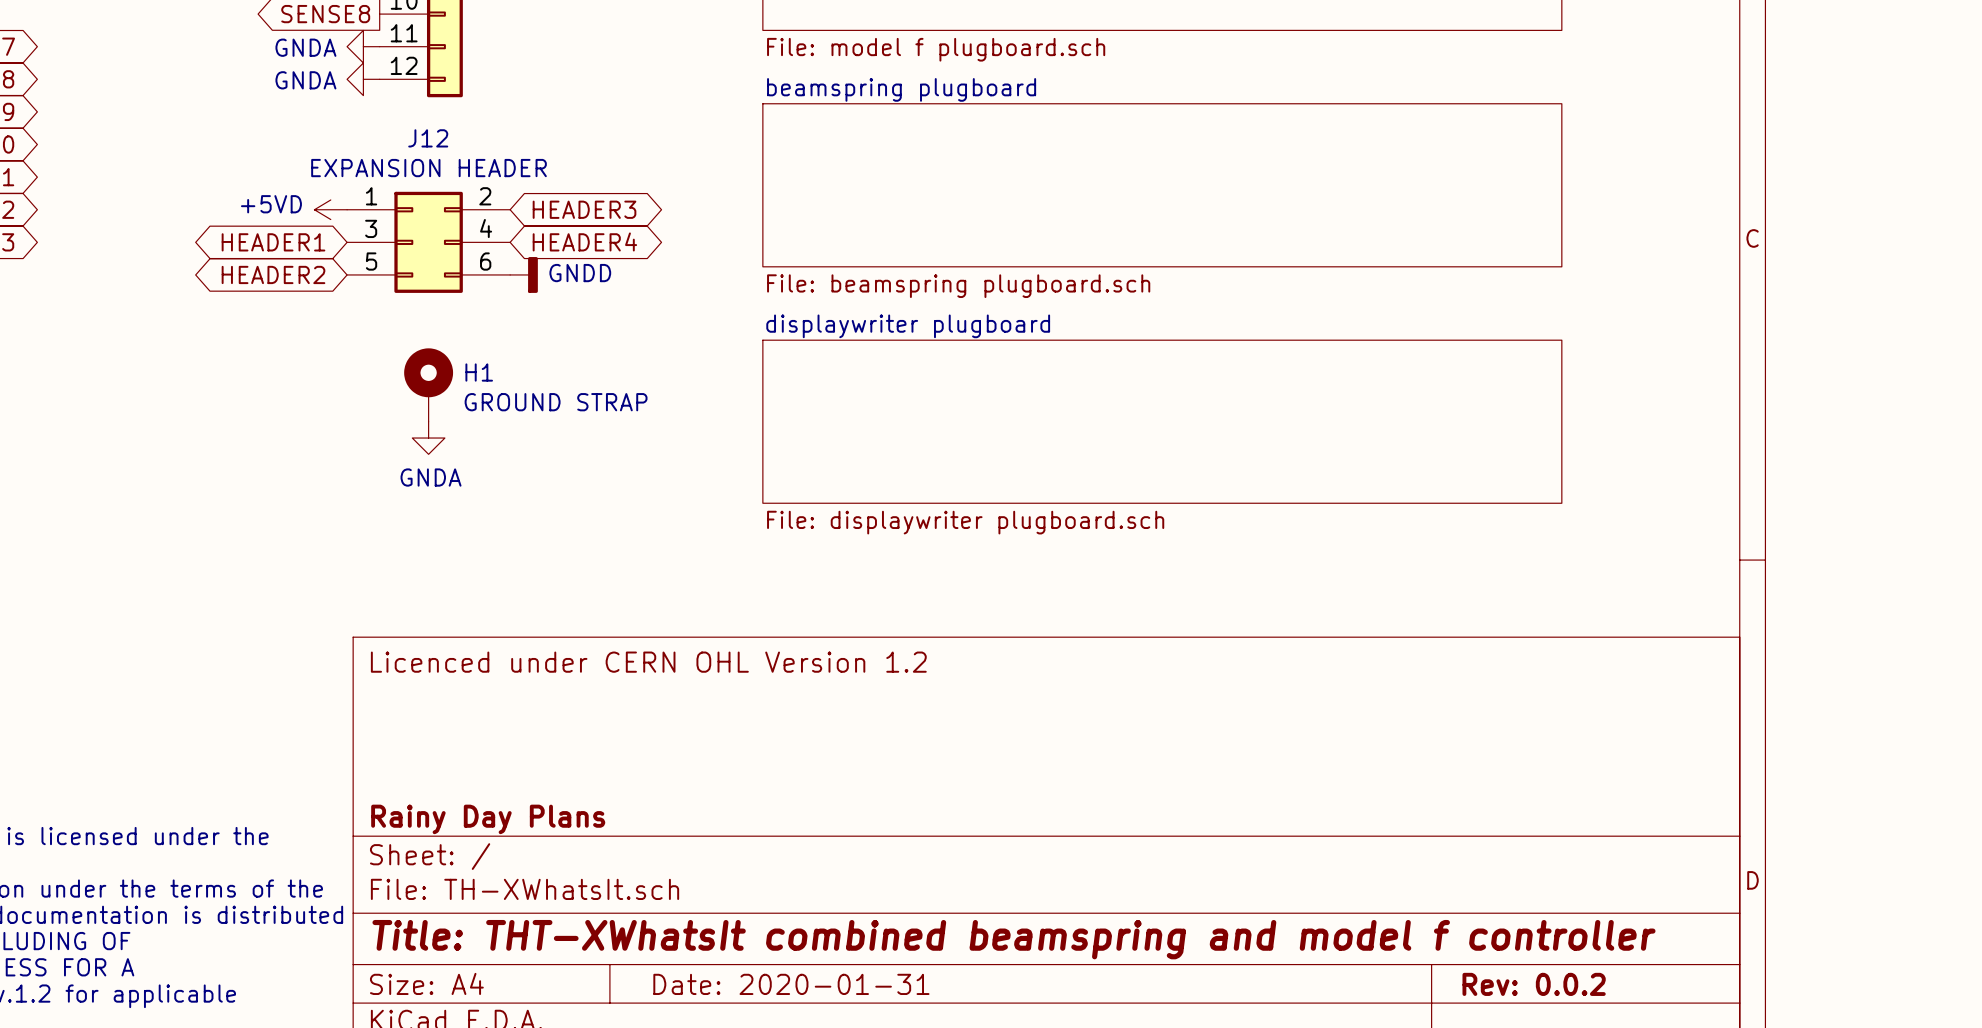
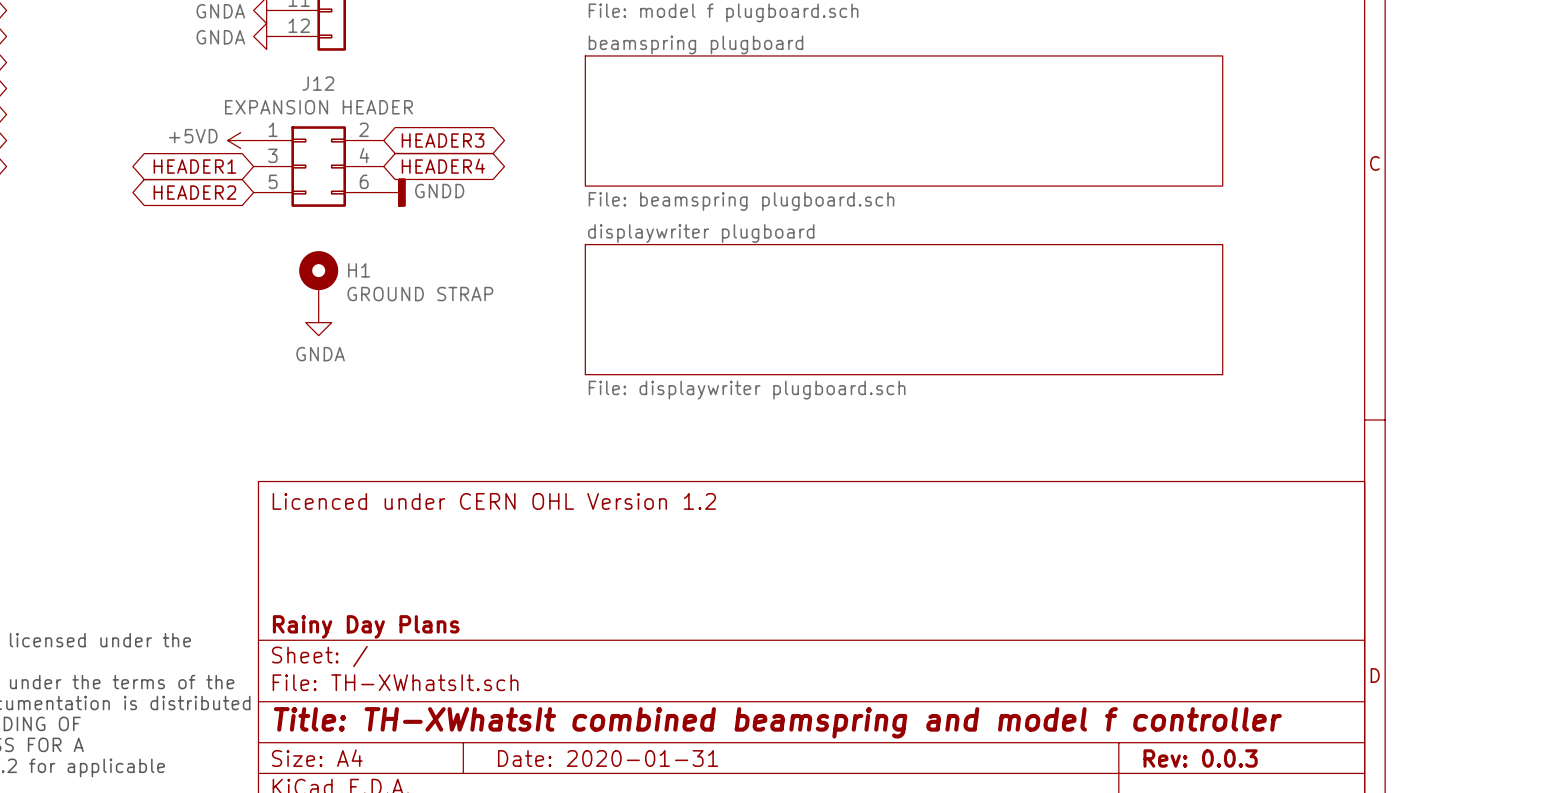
title block: Title: THT-XWhatsIt combined beamspring and model f controller (1013, 939) -> Title: TH-XWhatsIt combined beamspring and model f controller (777, 722)
title block: Rev: 0.0.2 (1534, 984) -> Rev: 0.0.3 (1200, 758)

